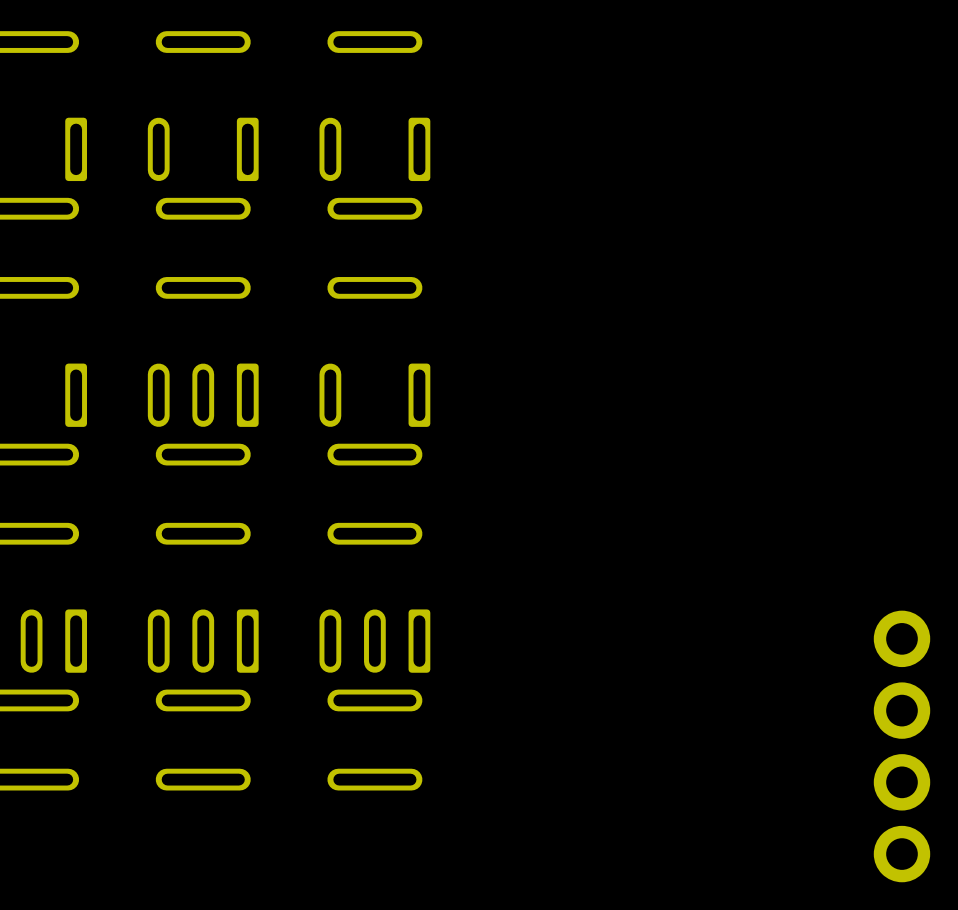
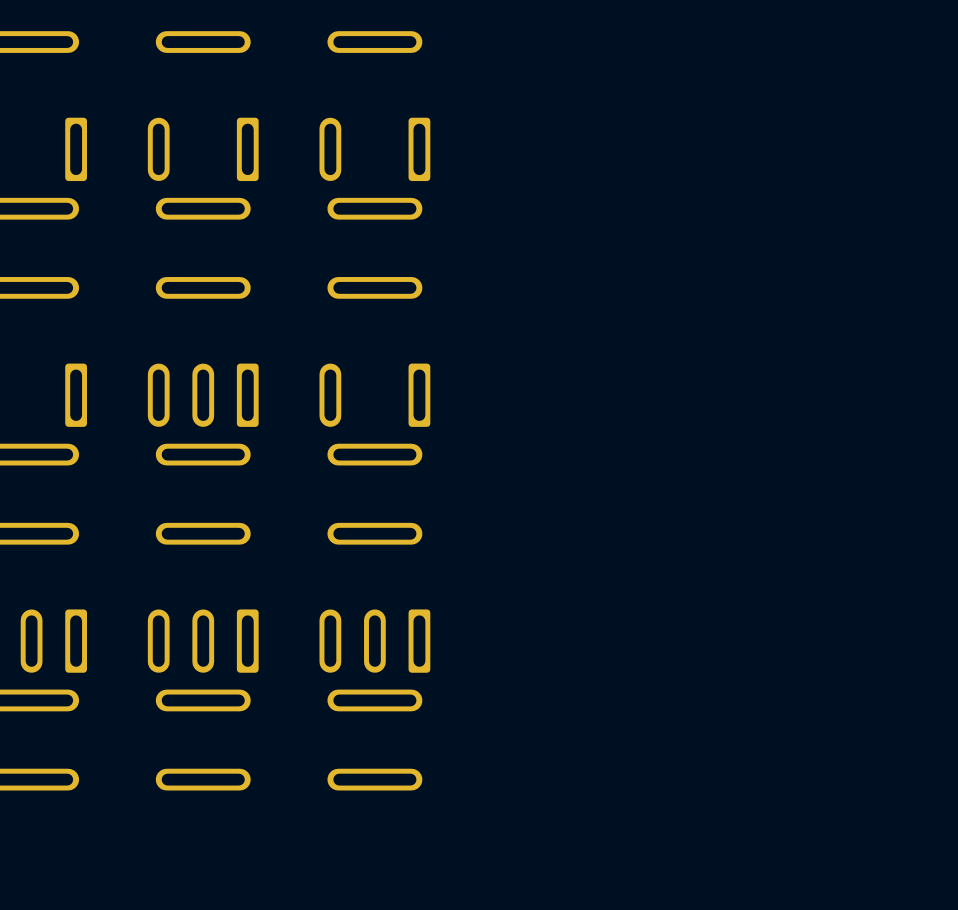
part: (901, 638) -> none
part: (901, 710) -> none
part: (901, 782) -> none
part: (901, 854) -> none

